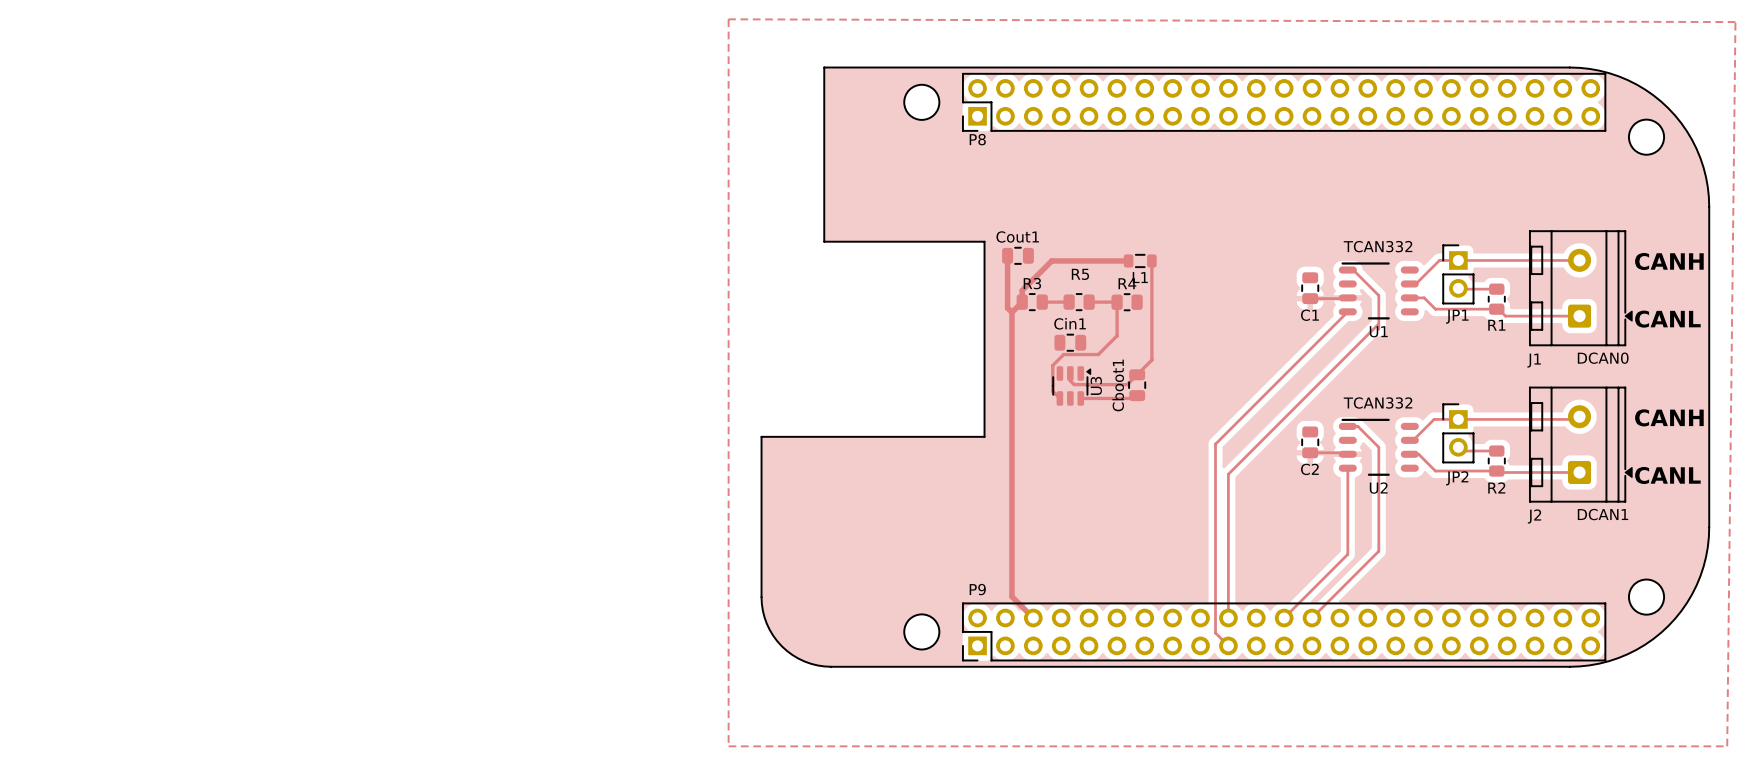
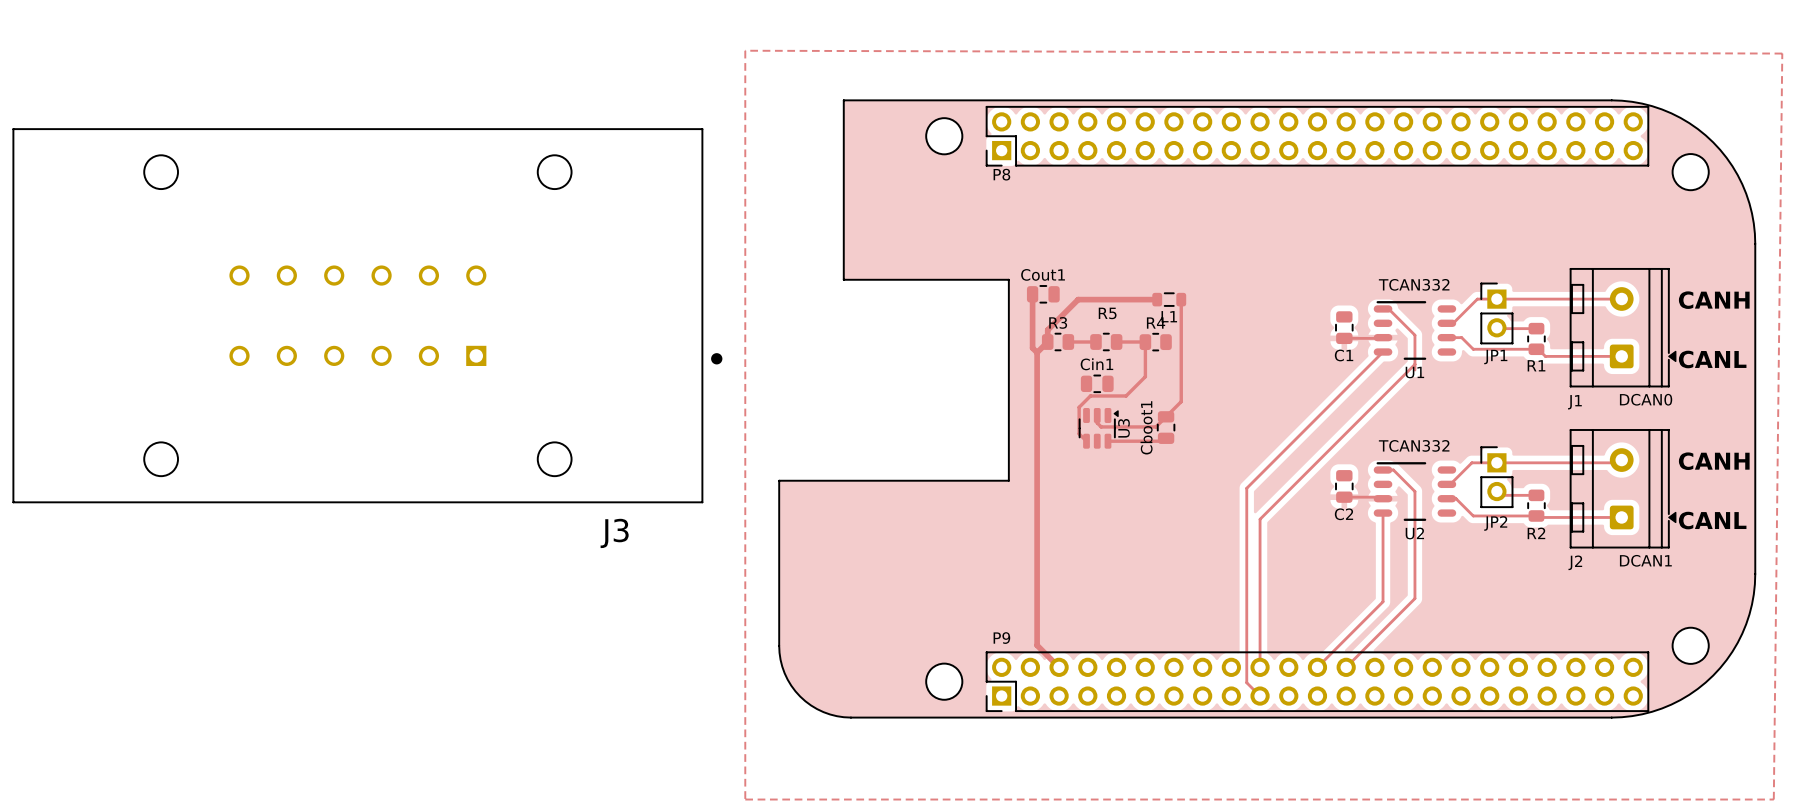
J3: none -> (367, 315)

